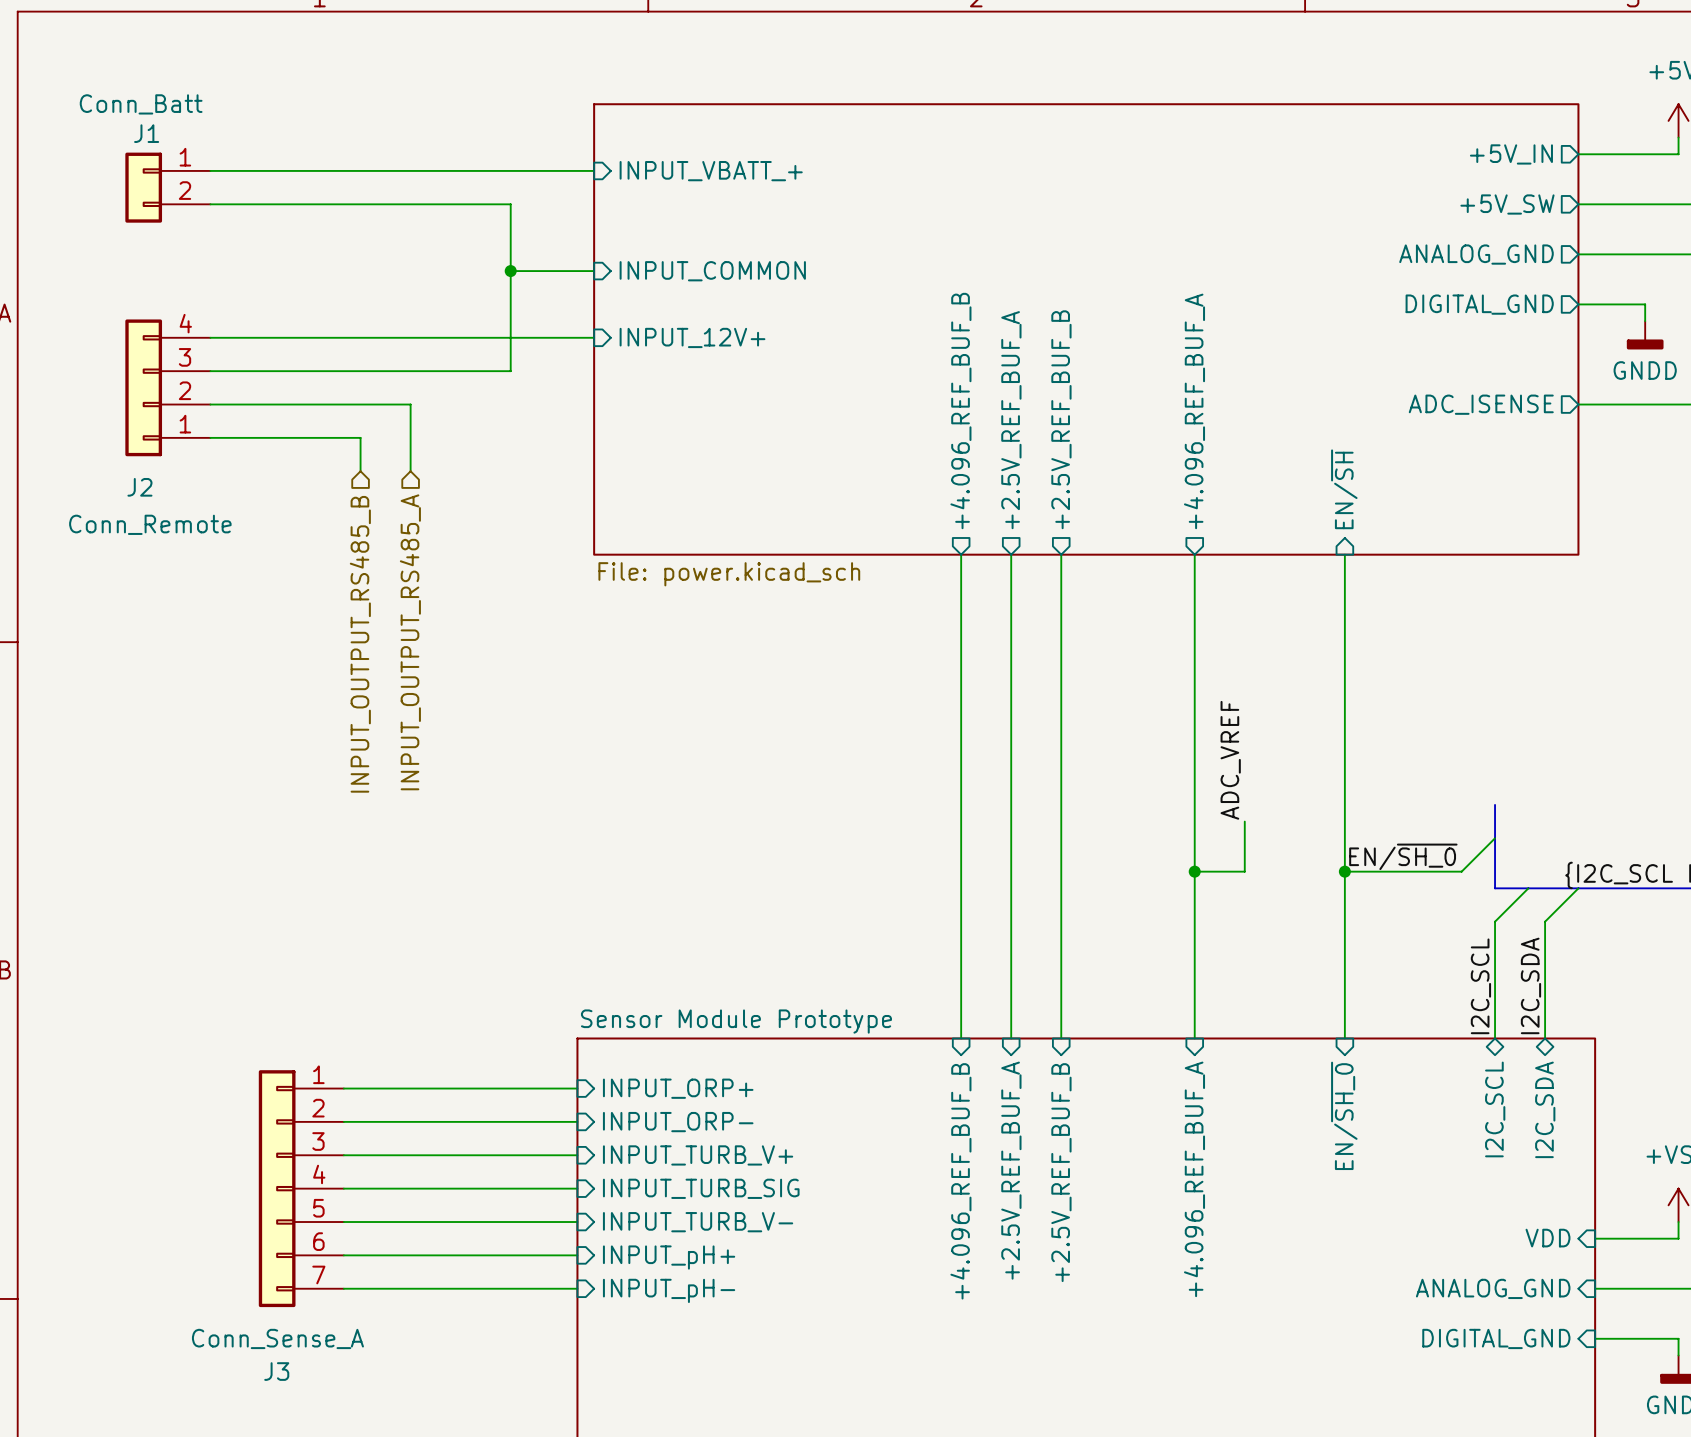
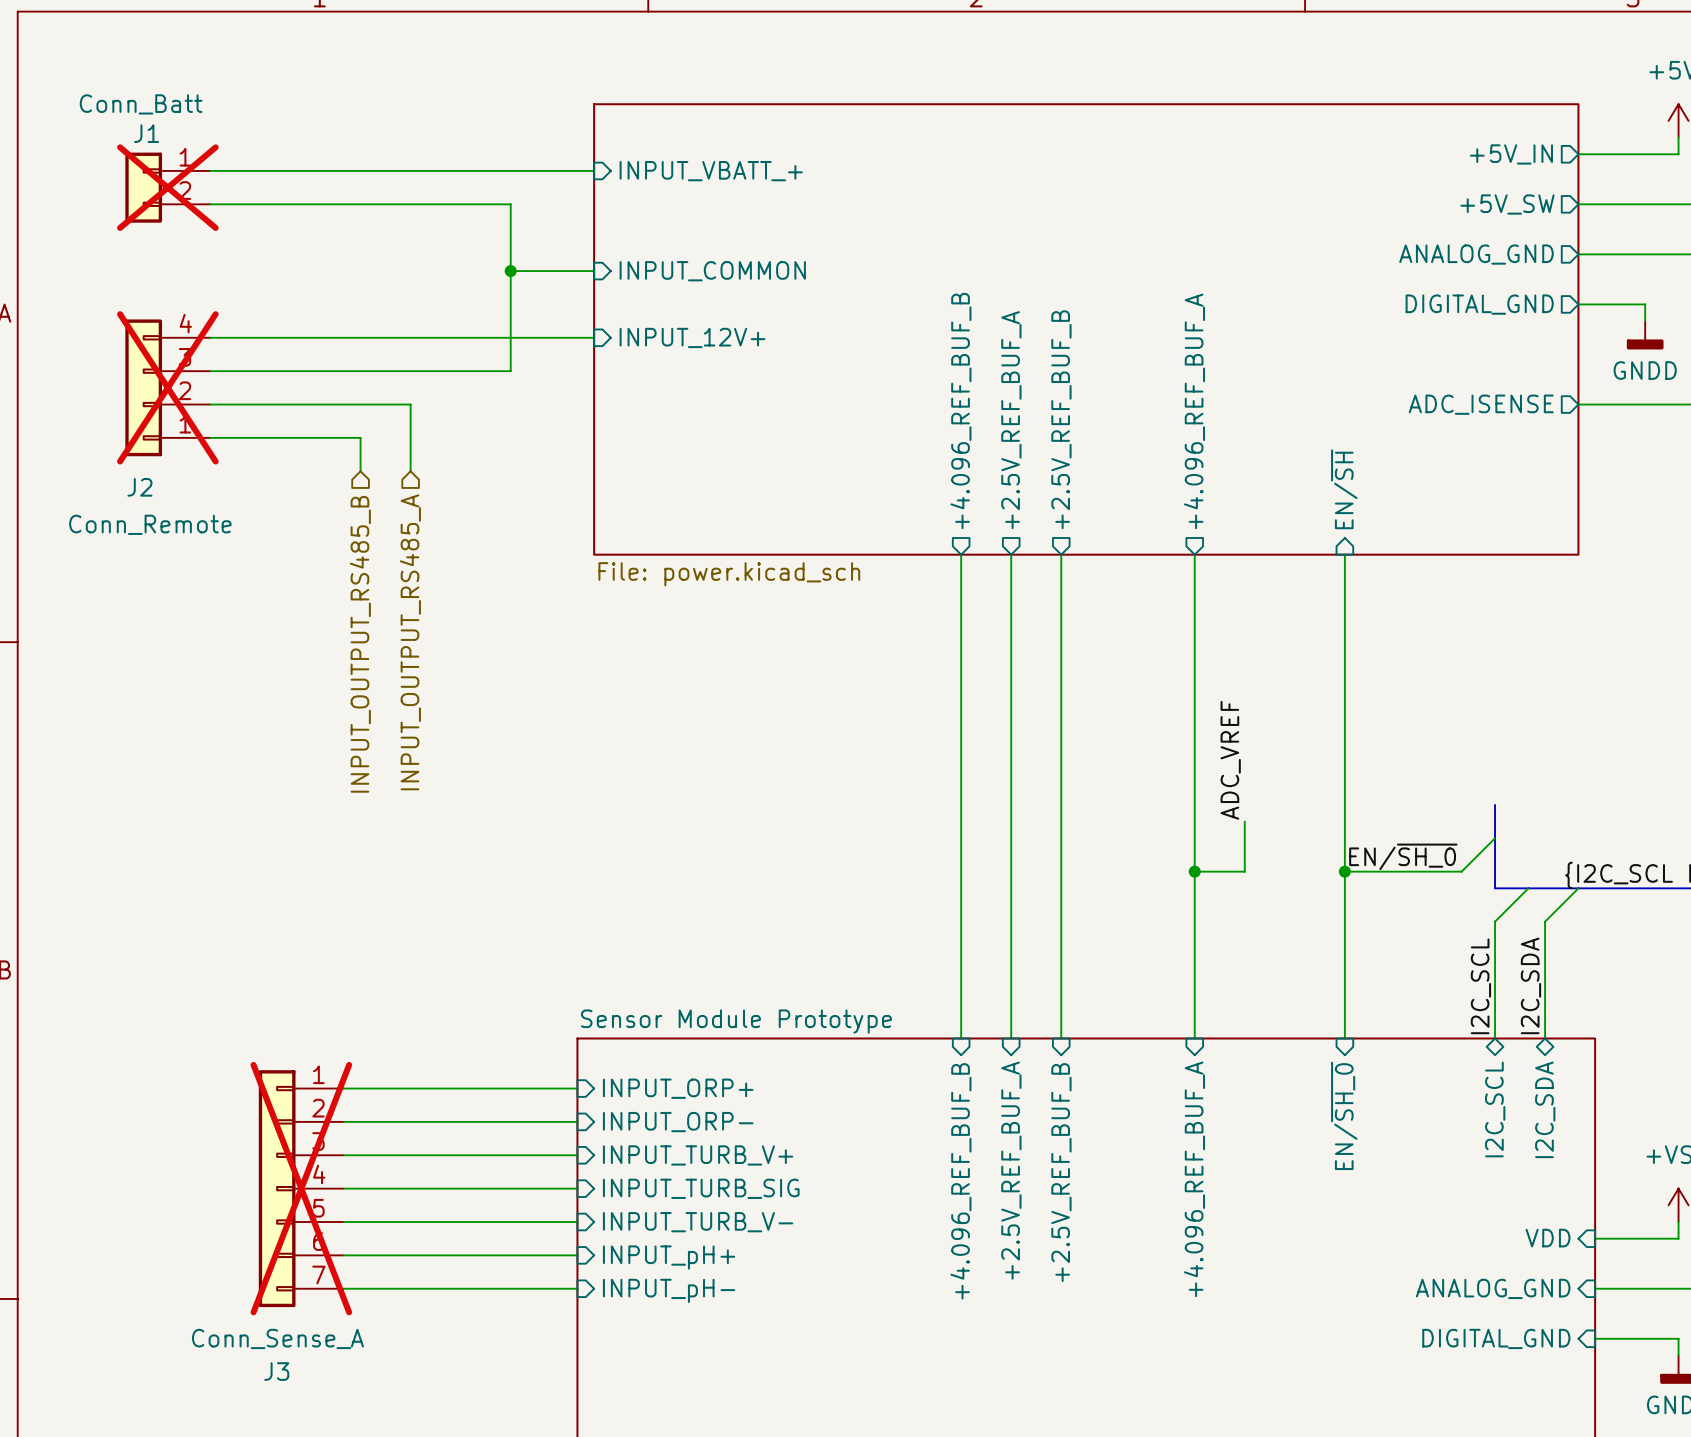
J1 do-not-place cross: none -> (167, 187)
J2 do-not-place cross: none -> (167, 387)
J3 do-not-place cross: none -> (301, 1188)

